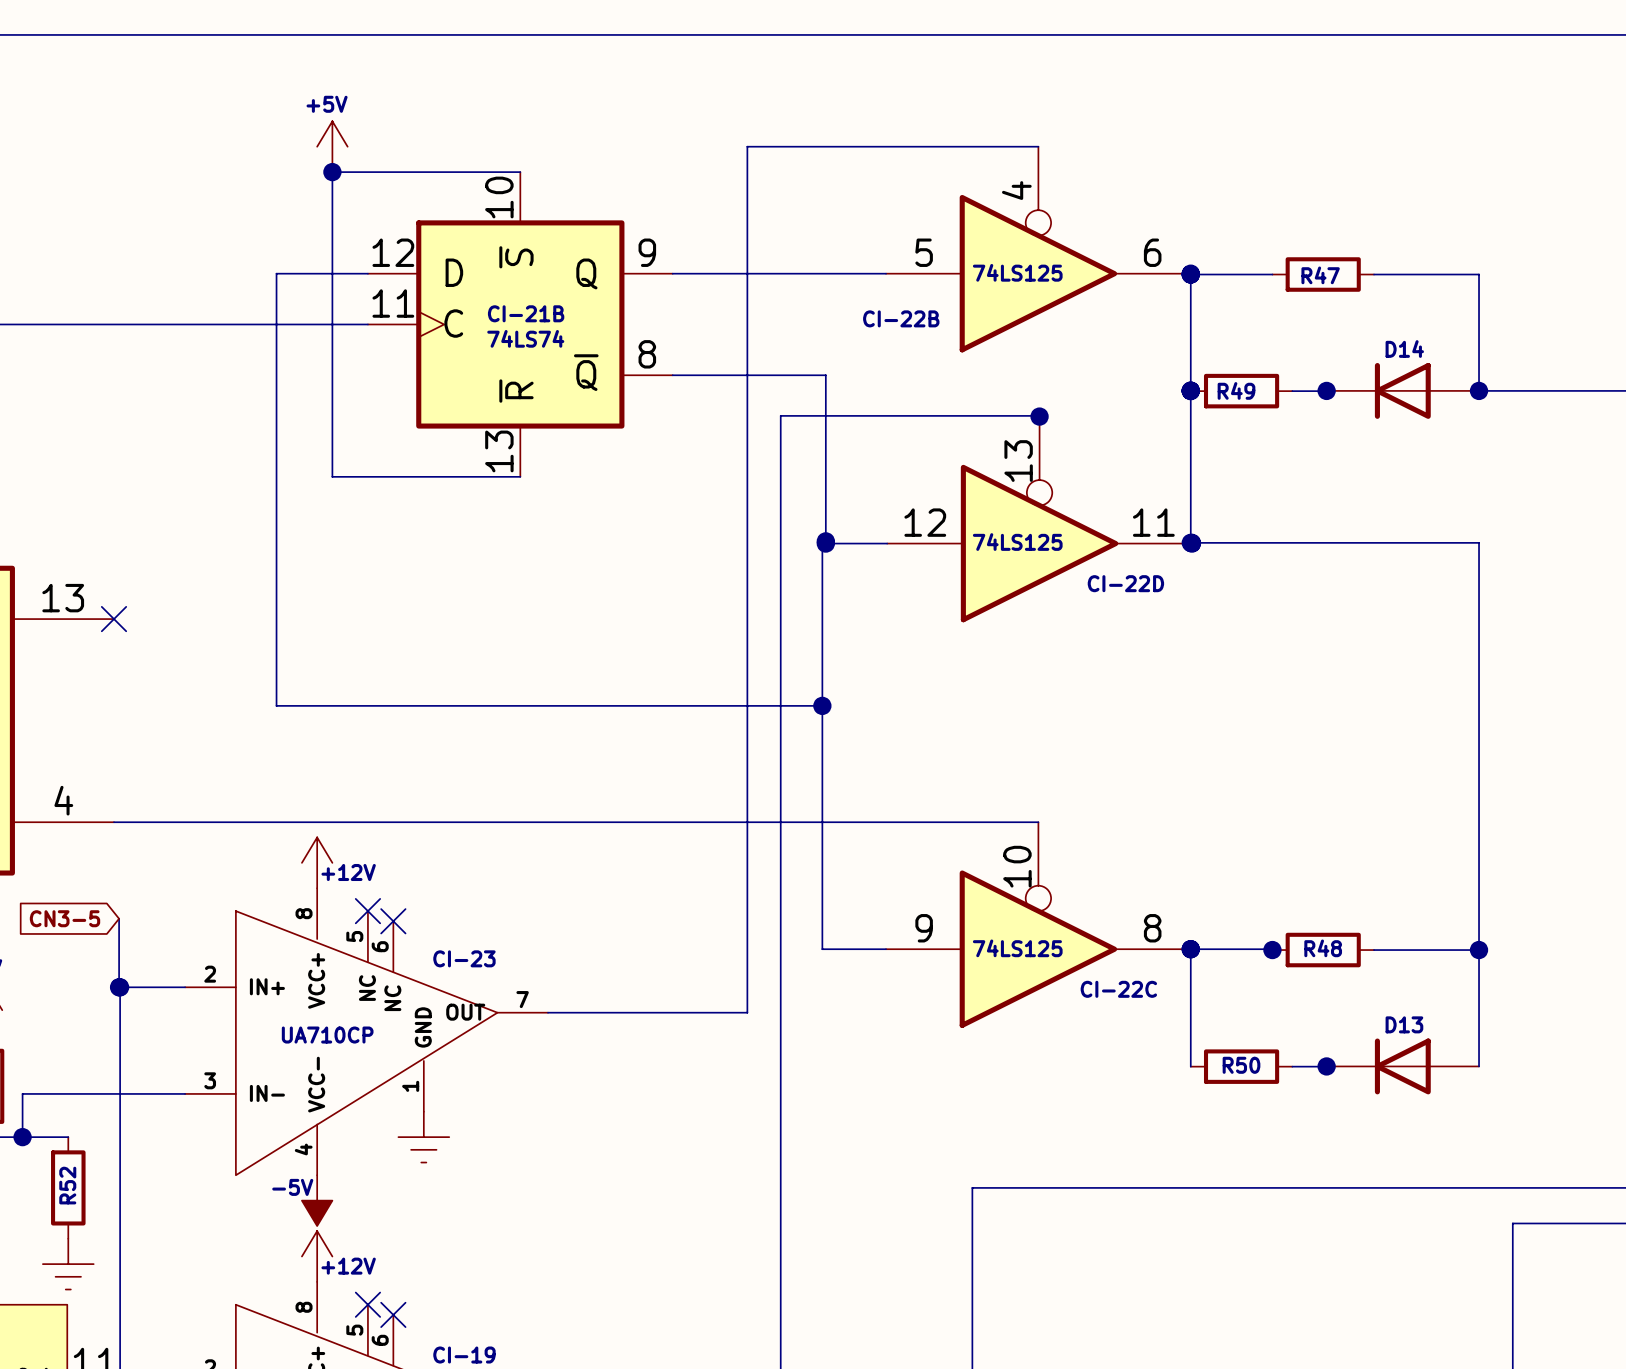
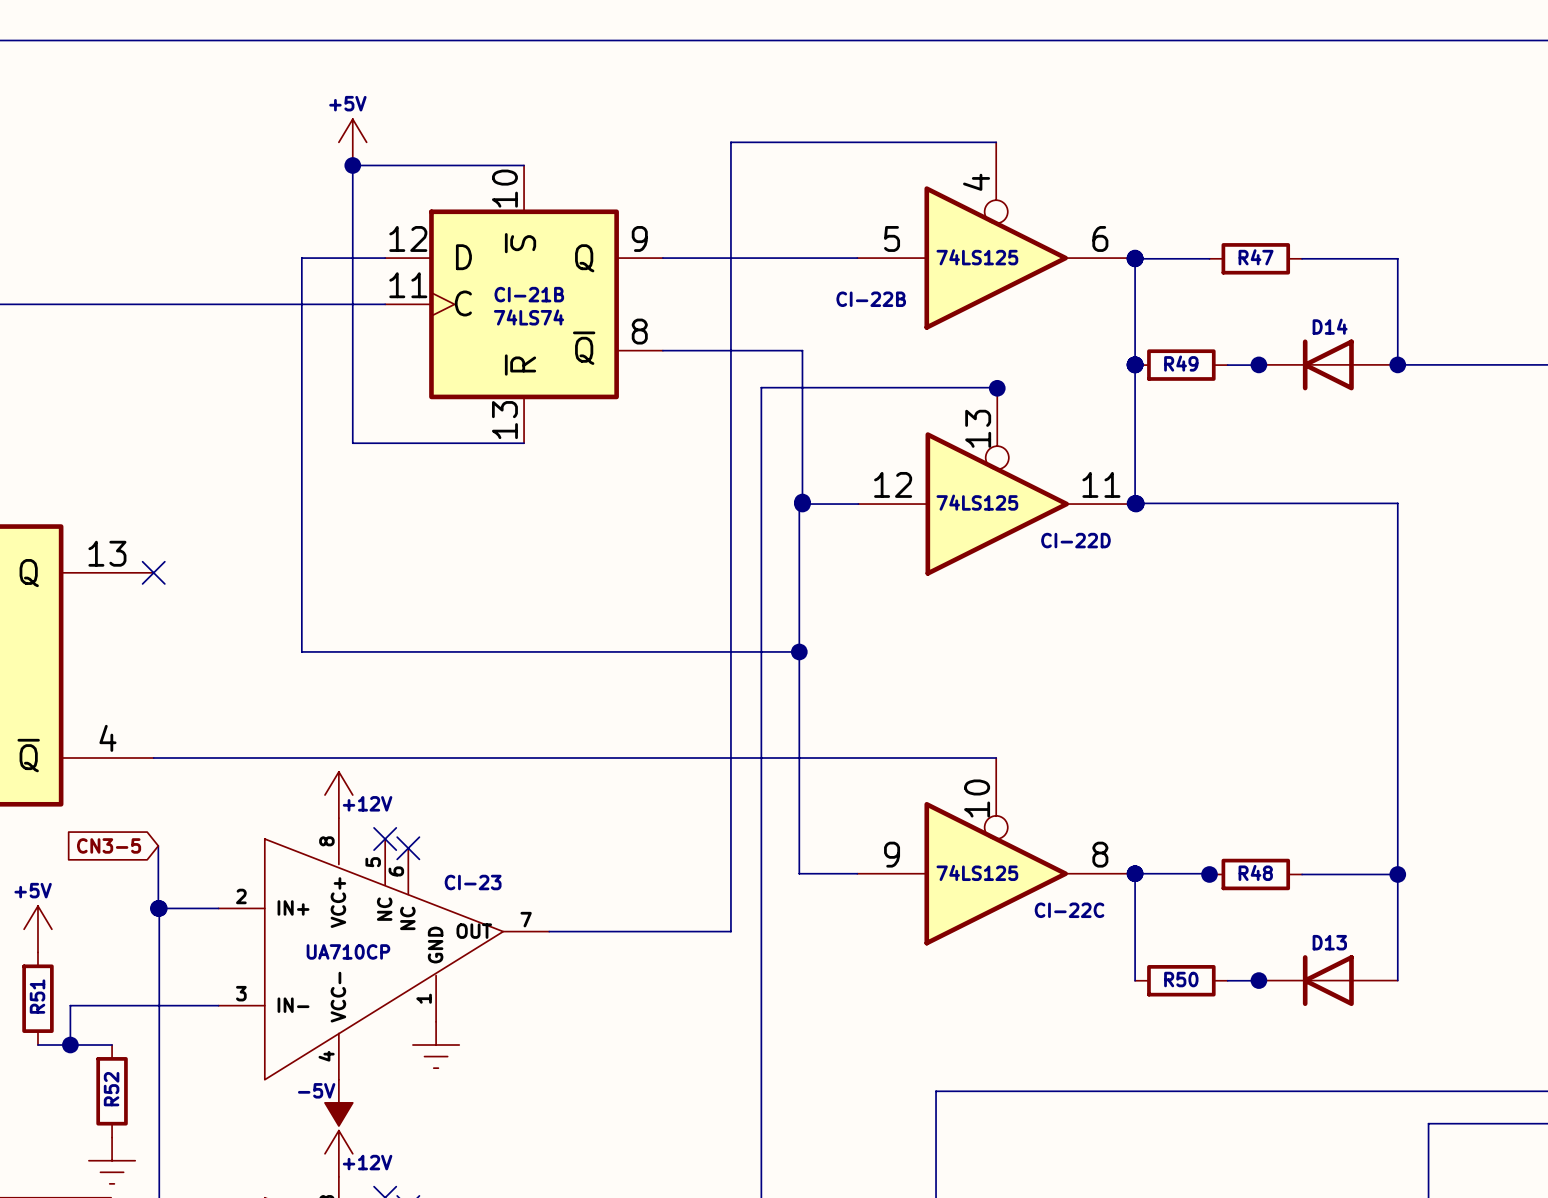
R47 value: none -> R47 (1256, 257)
R47 name: R47 (1320, 275) -> none
R49 value: none -> R49 (1181, 363)
R49 name: R49 (1236, 390) -> none

